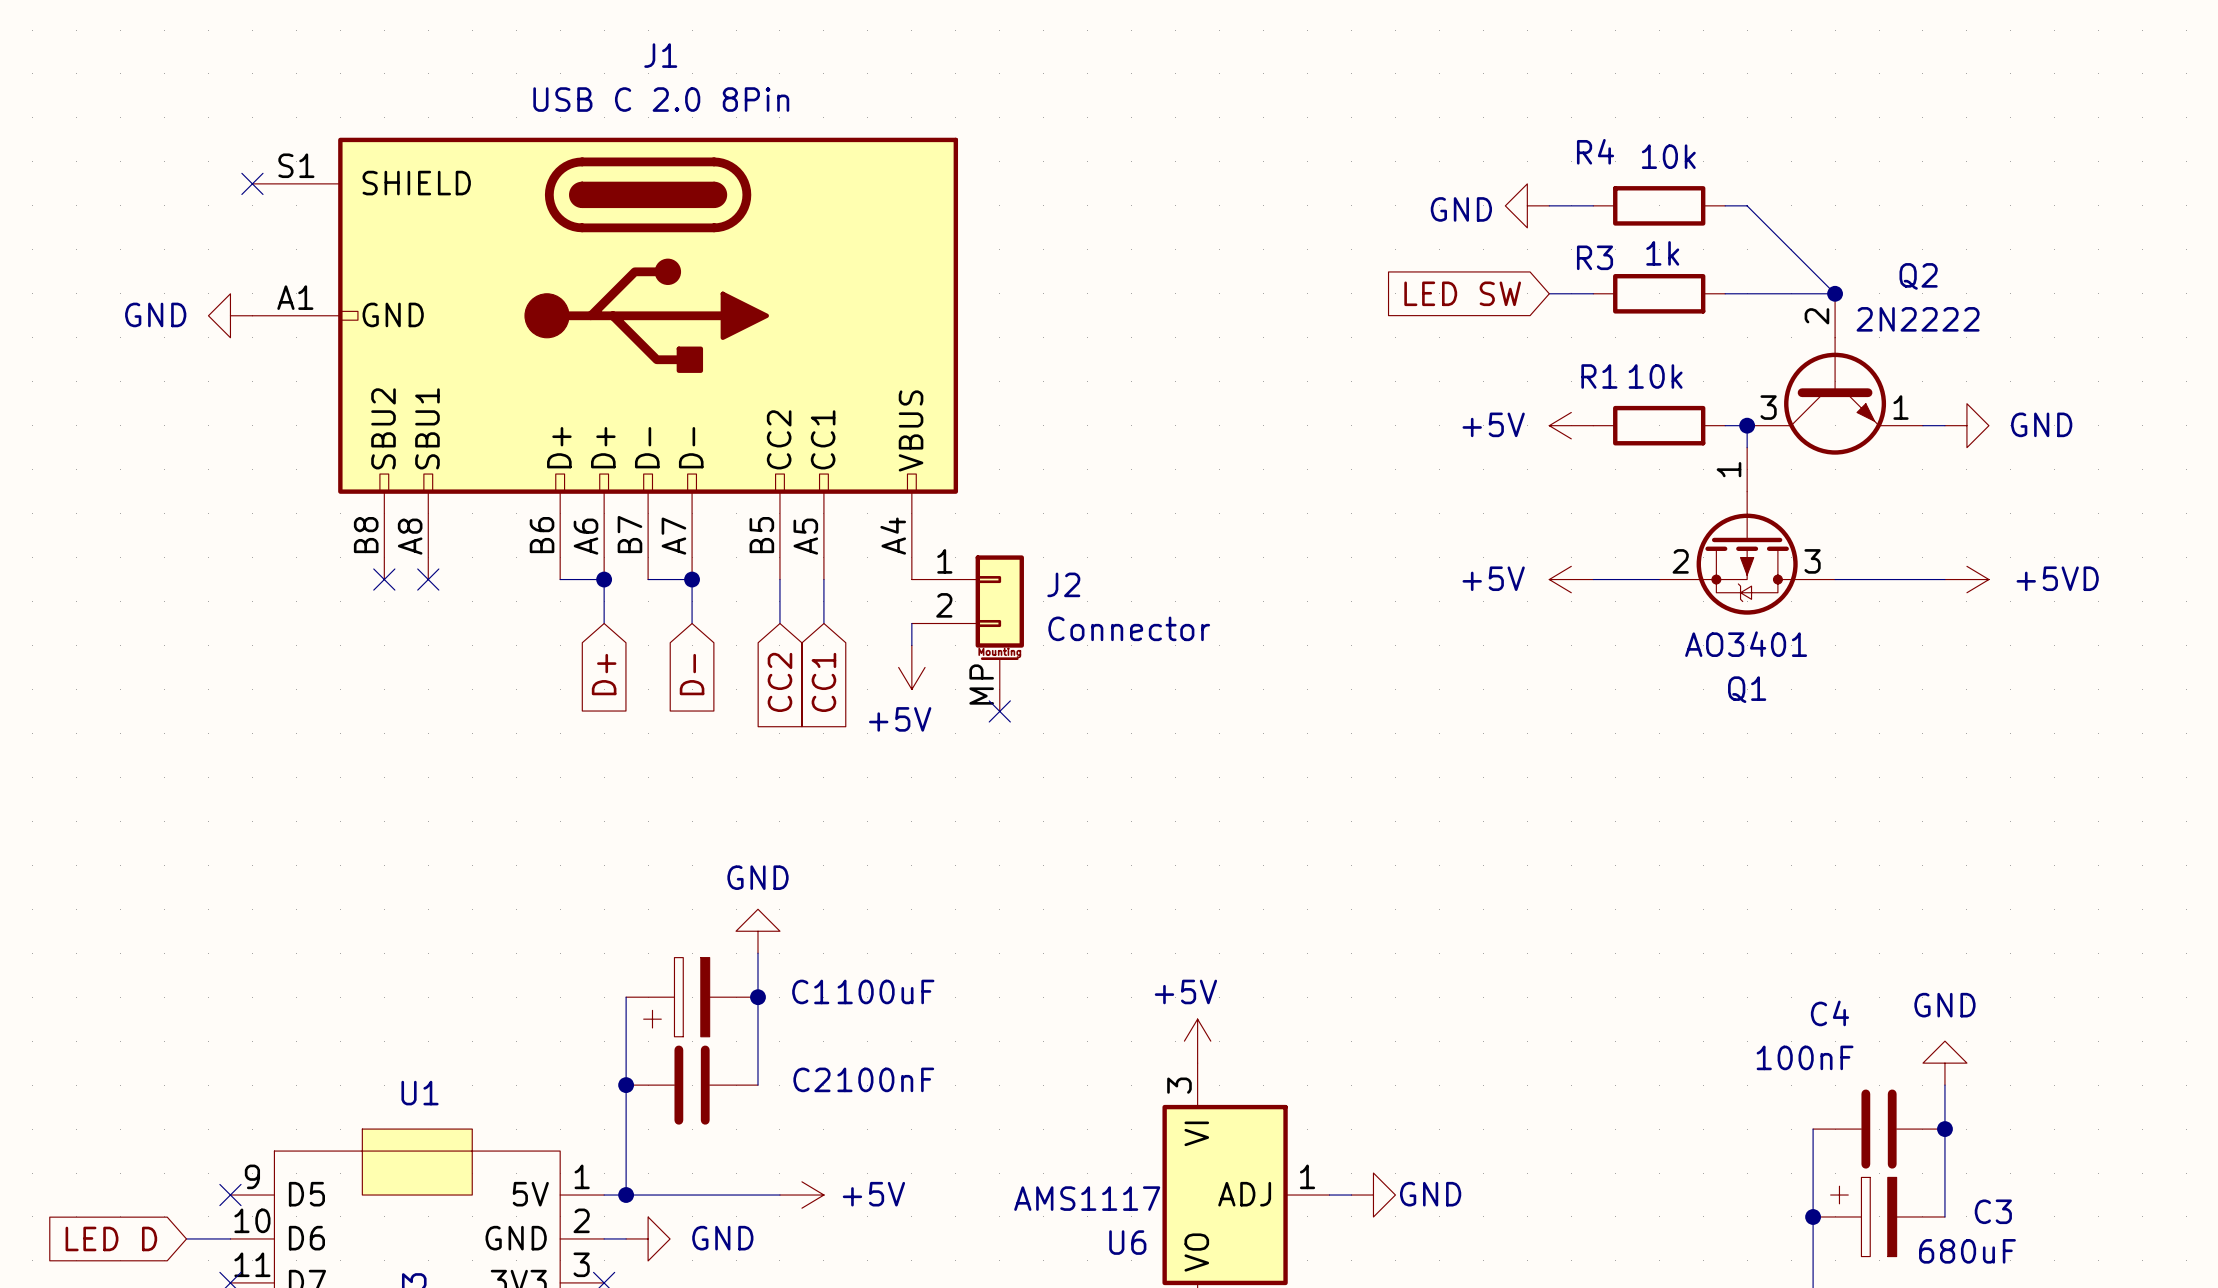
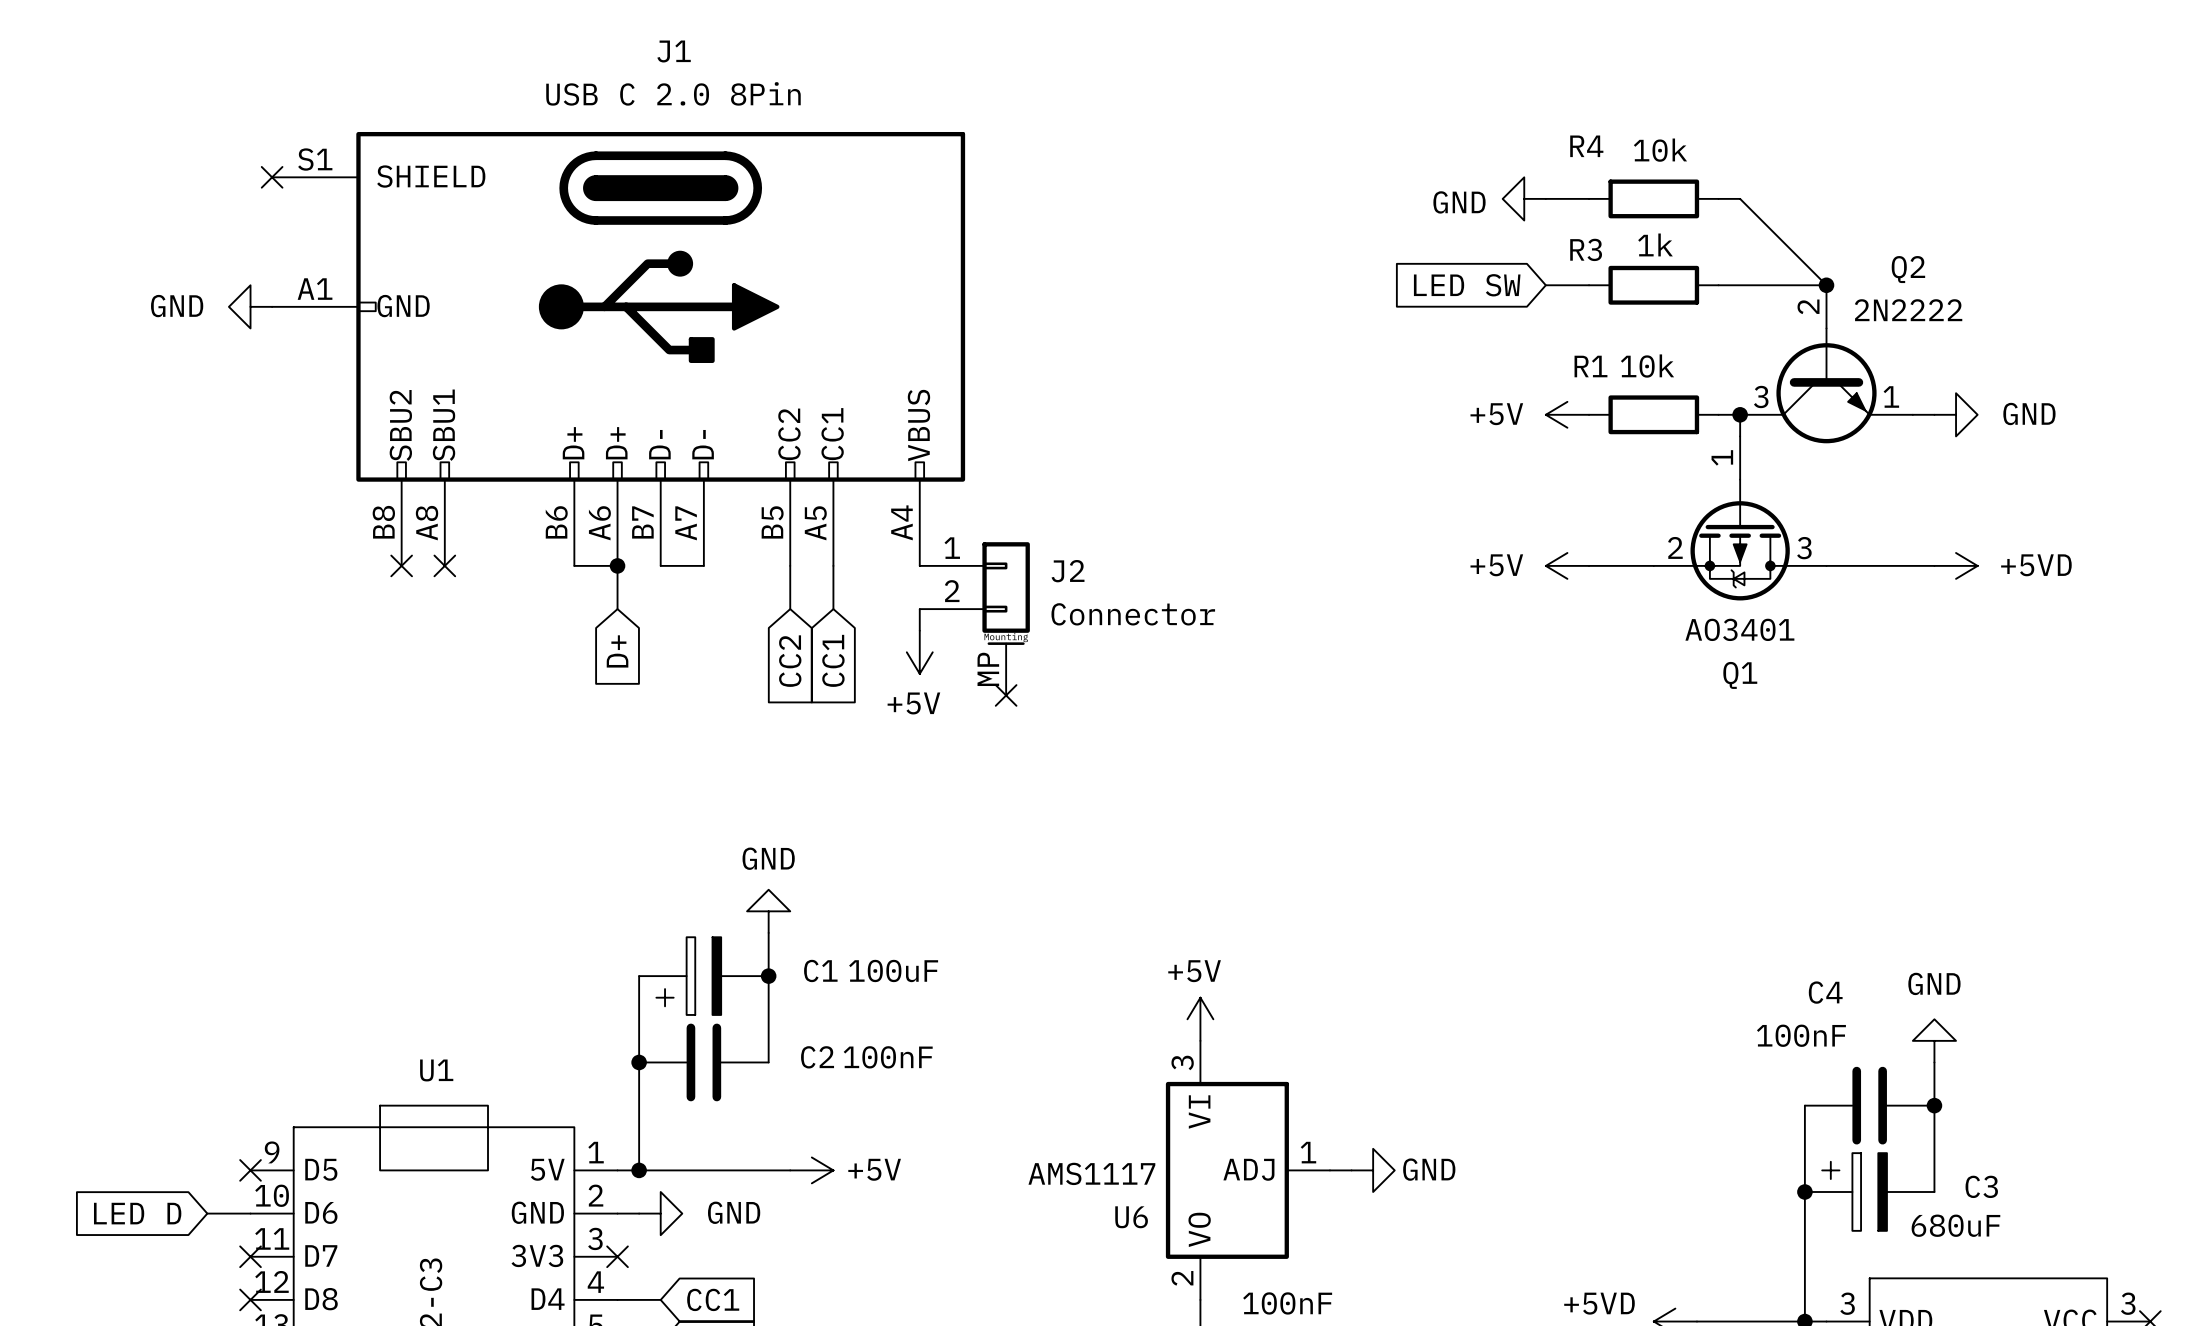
wire: (692, 579) (692, 623) -> none
junction: (692, 579) -> none
global label: D- (692, 674) -> none

